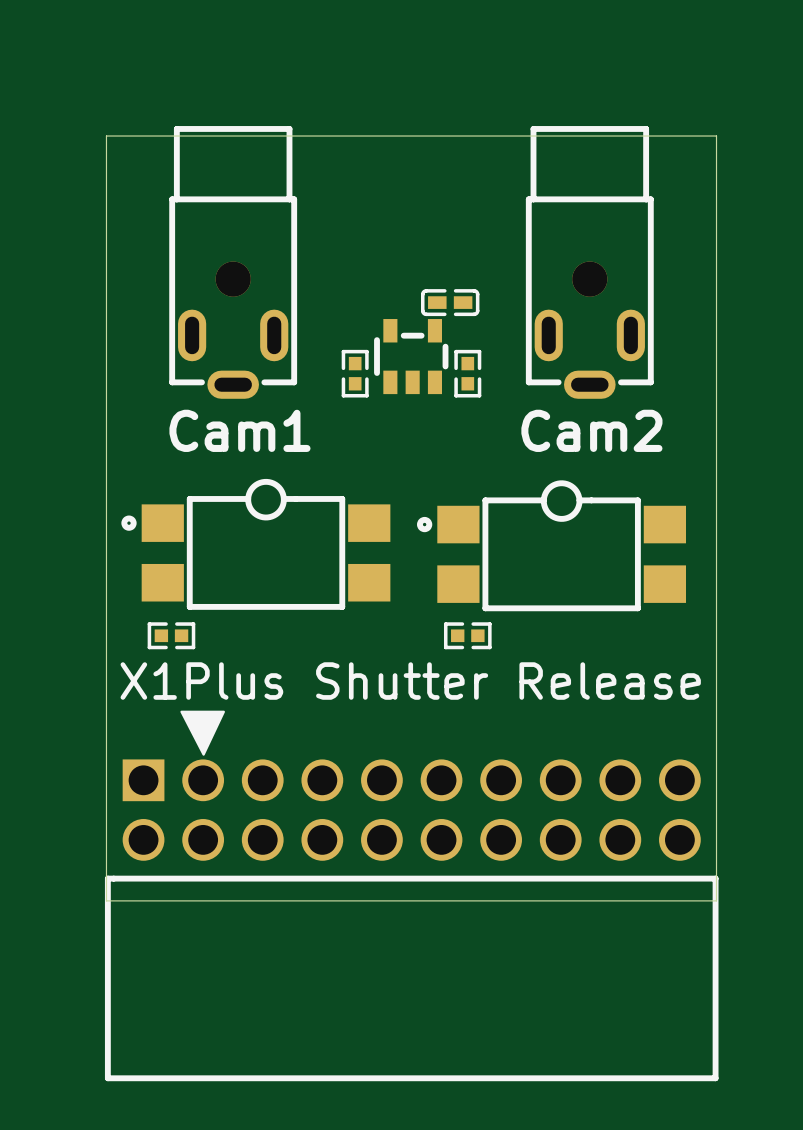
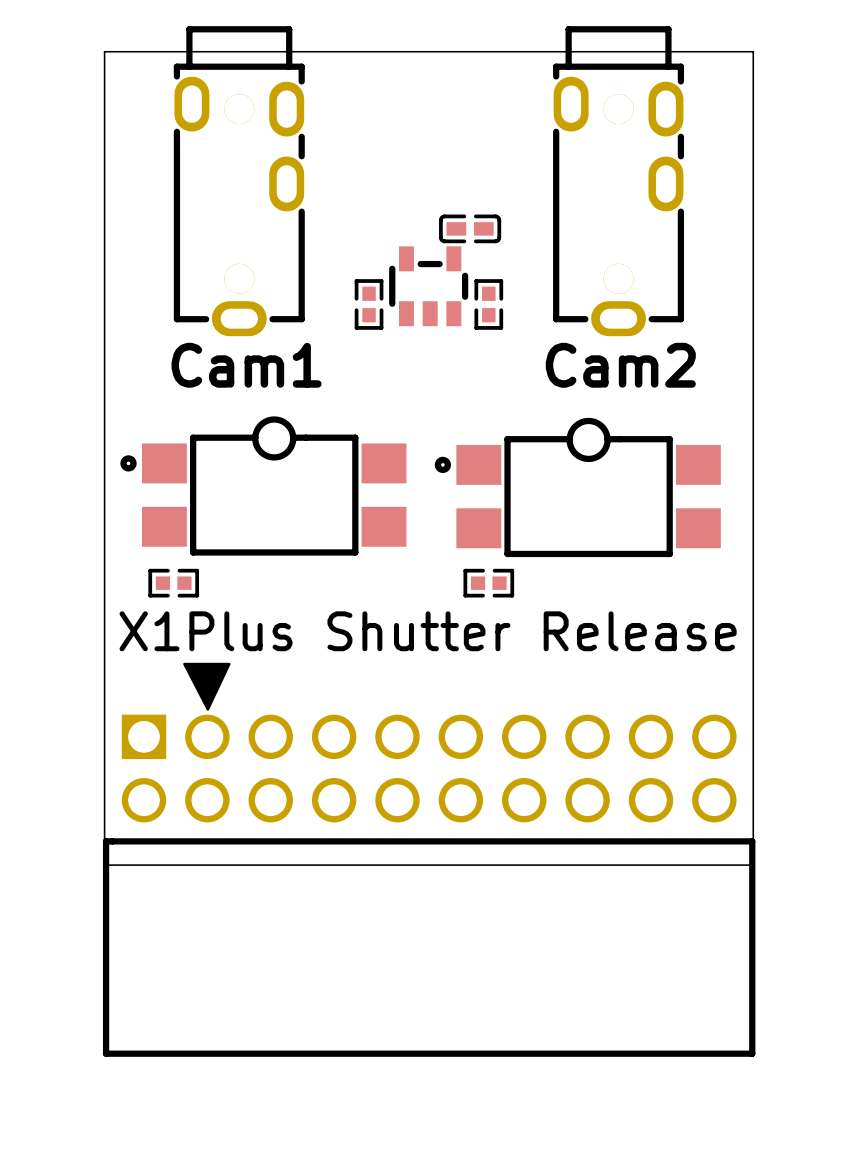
part footprint: [169, 126, 298, 399] -> [173, 26, 305, 337]
part footprint: [525, 126, 654, 399] -> [553, 26, 685, 337]

